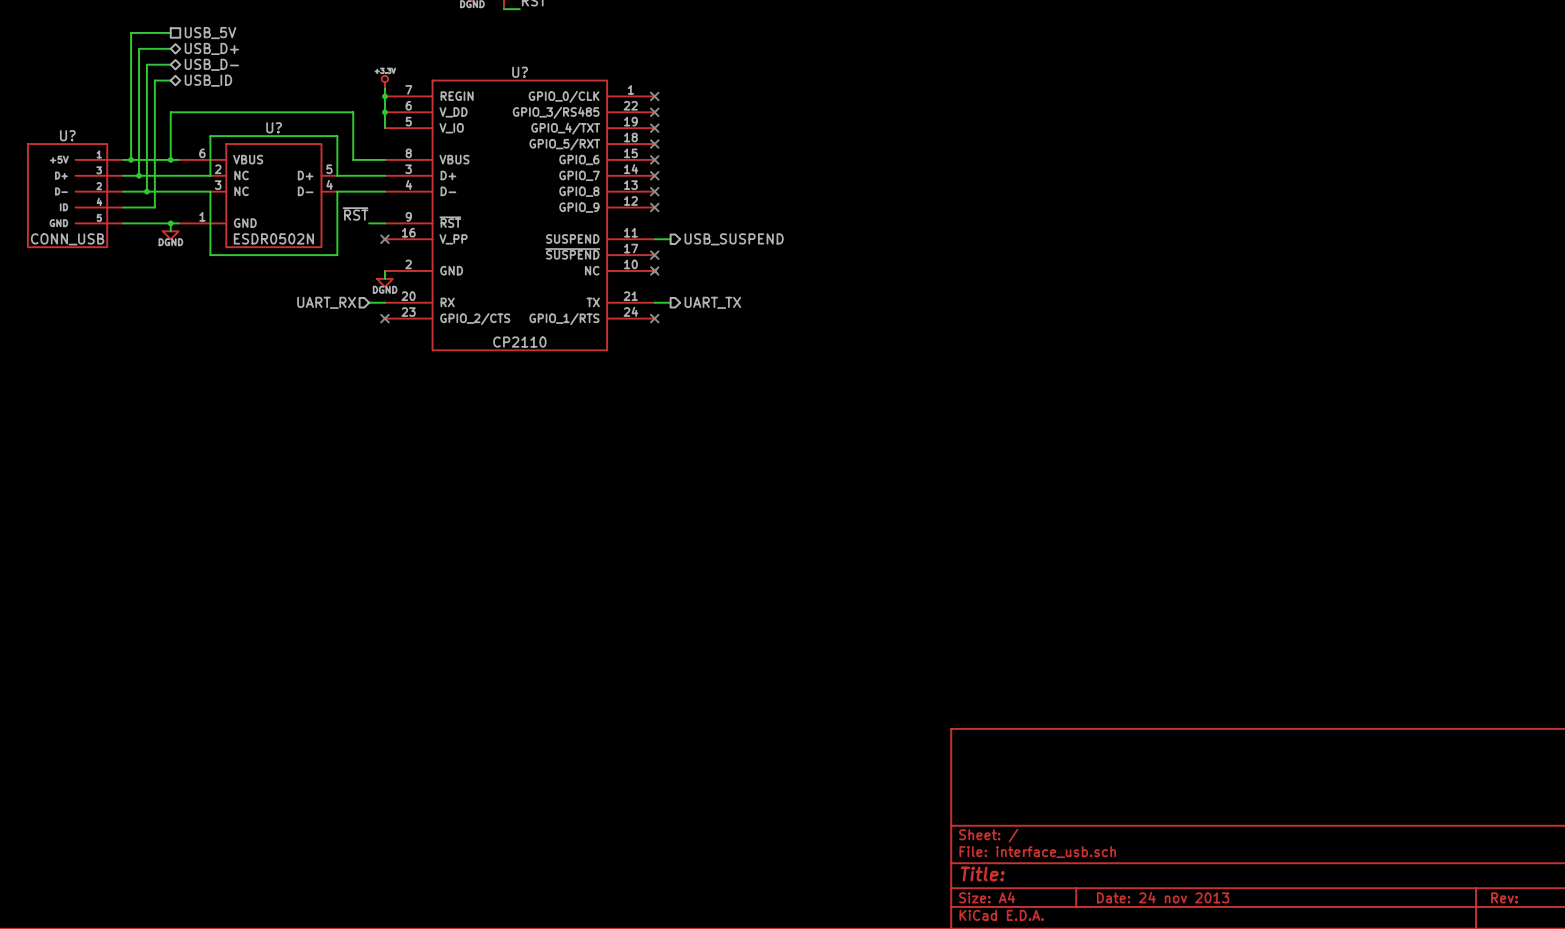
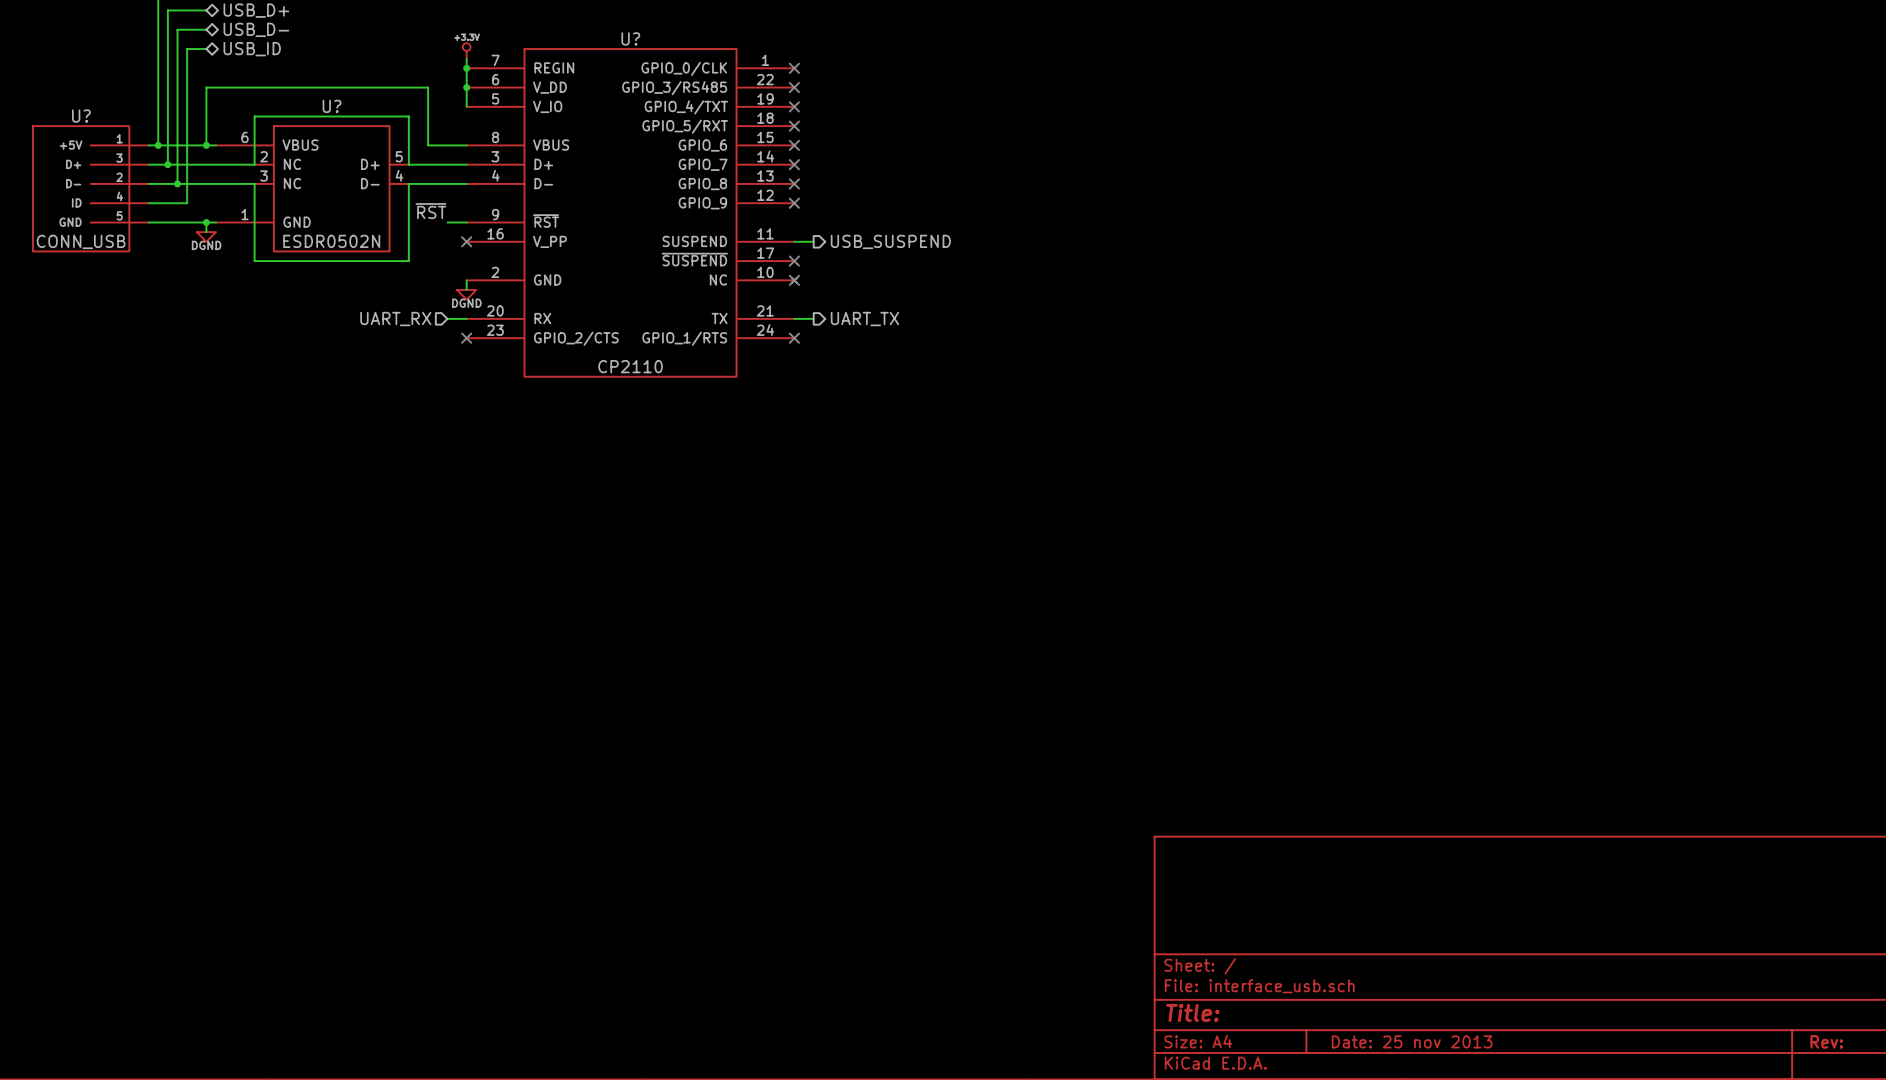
title block: Date: 24 nov 2013 (1163, 897) -> Date: 25 nov 2013 (1412, 1041)

